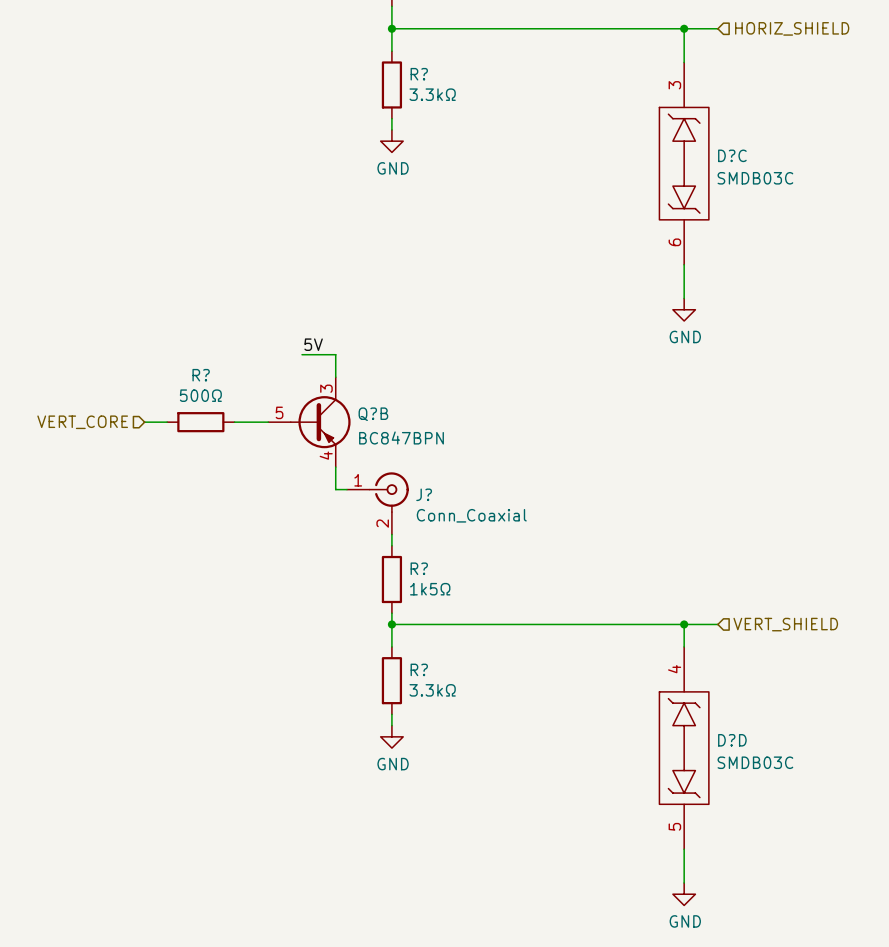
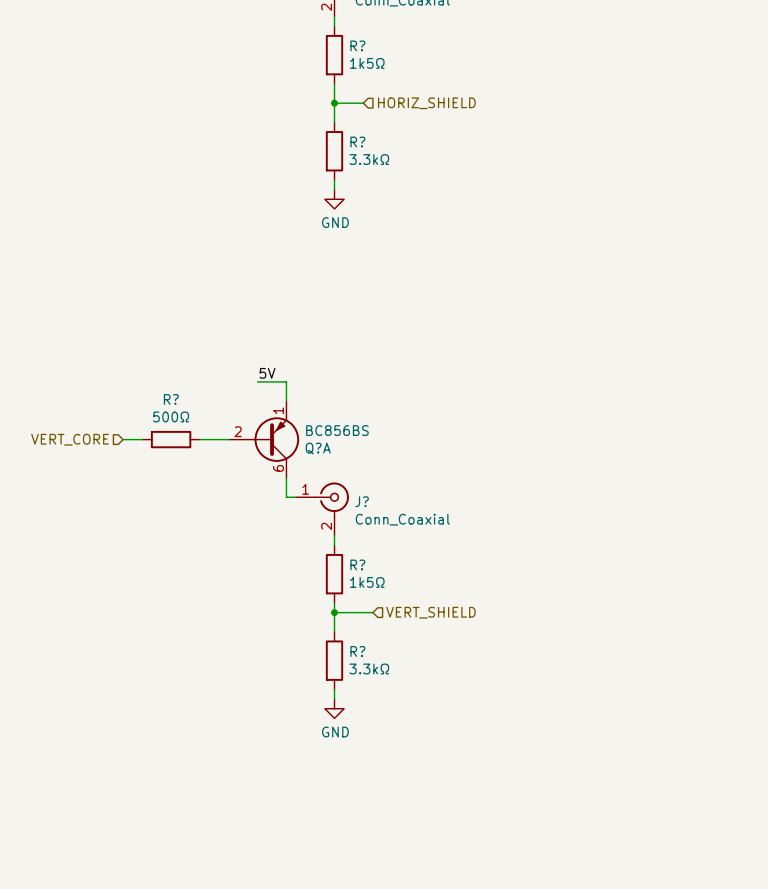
wire: (425, 28) (717, 28) -> none
hierarchical label: none -> HORIZ_SHIELD (426, 103)
wire: (684, 28) (684, 62) -> none
junction: (684, 28) -> none
hierarchical label: HORIZ_SHIELD (792, 28) -> none
D?C: SMDB03C (684, 163) -> none
wire: (684, 264) (684, 298) -> none
power symbol: GND (684, 309) -> none
Q?B: BC847BPN (309, 422) -> none
Q?A: none -> BC856BS (263, 439)
wire: (436, 624) (717, 624) -> none
hierarchical label: none -> VERT_SHIELD (431, 612)
wire: (684, 624) (684, 646) -> none
junction: (684, 624) -> none
hierarchical label: VERT_SHIELD (785, 624) -> none
D?D: SMDB03C (684, 748) -> none
wire: (684, 849) (684, 882) -> none
power symbol: GND (684, 894) -> none

